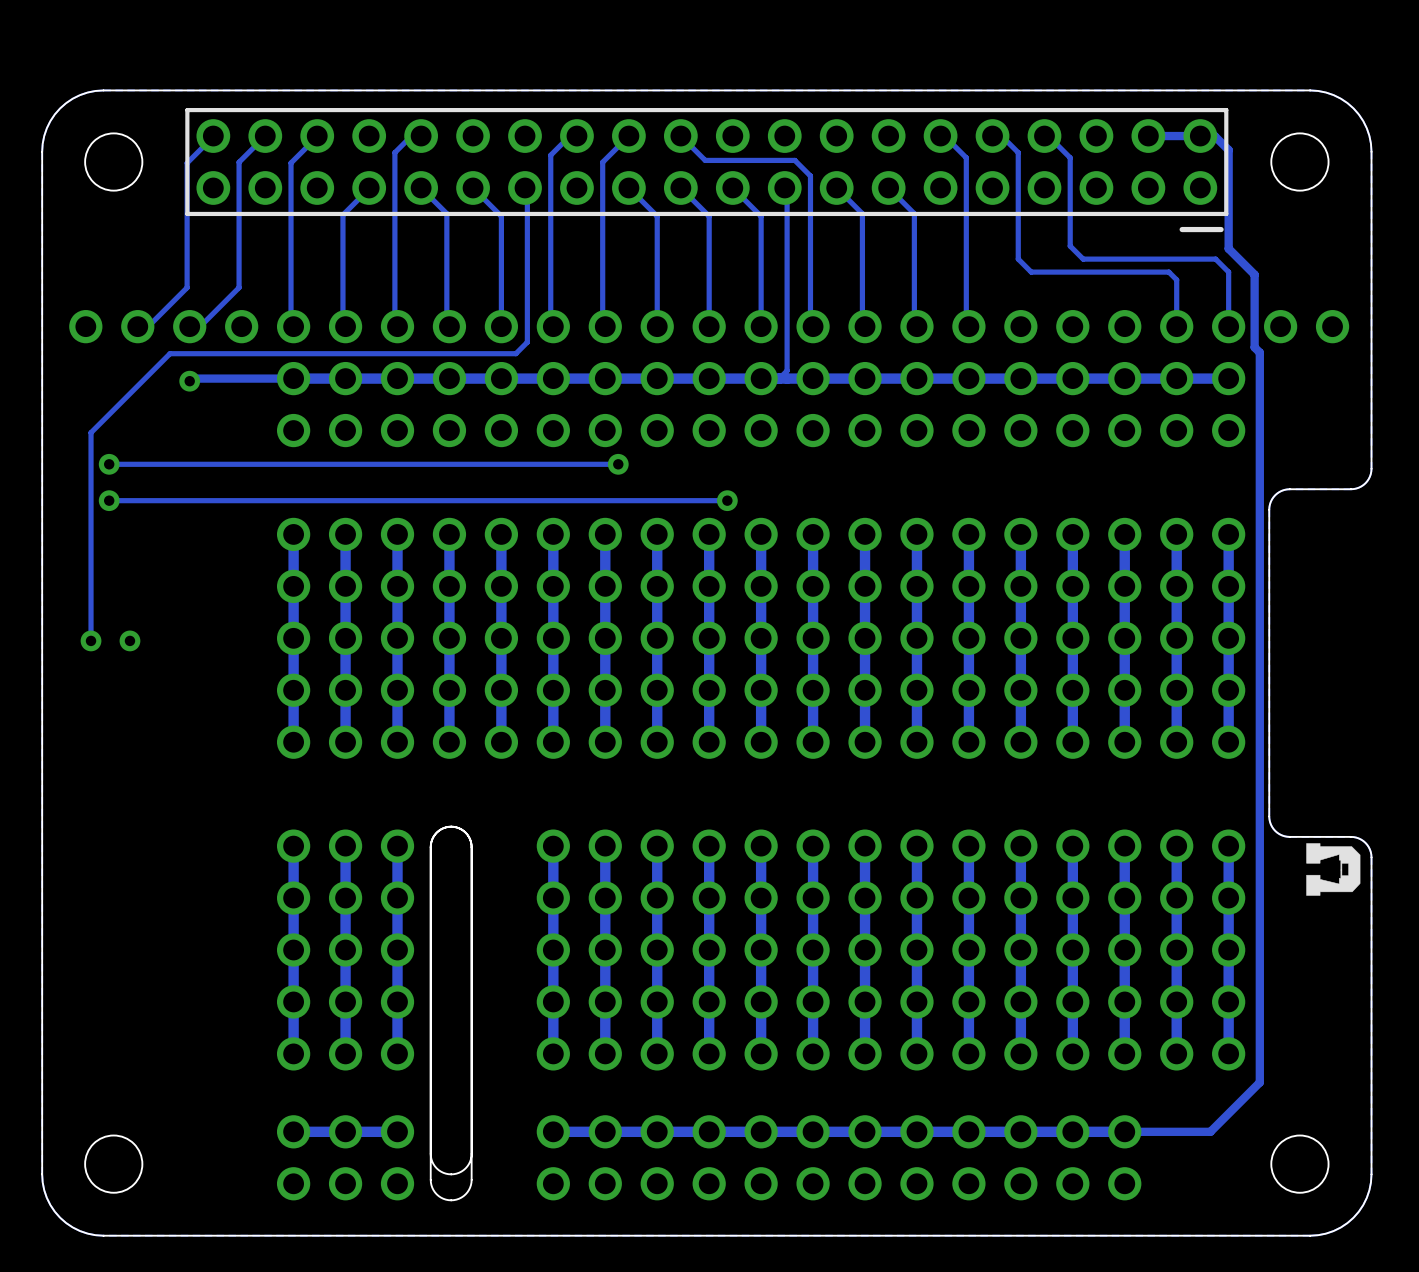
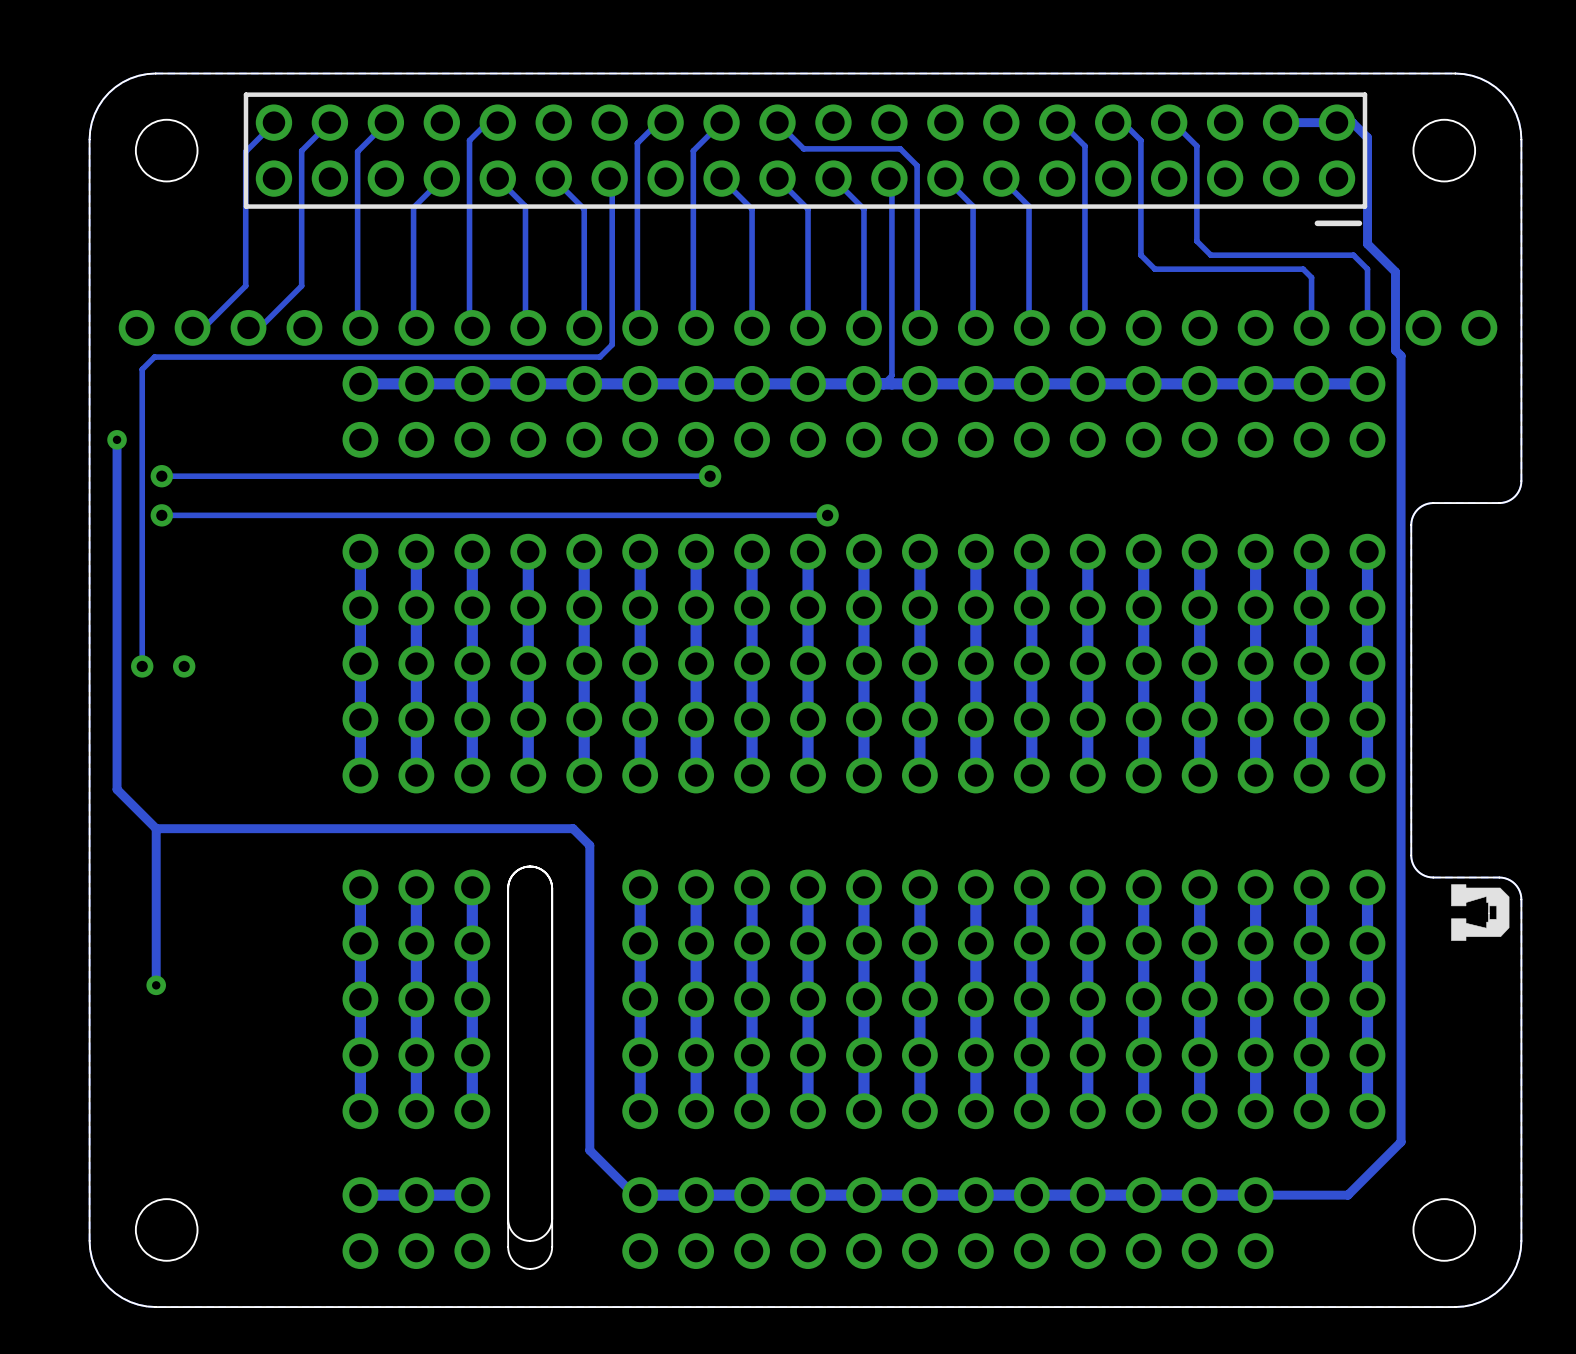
track: (170, 353) (91, 432) -> (227, 357) (154, 357) (142, 369) (142, 442)
track: (293, 378) (192, 378) (189, 381) -> none
via: (189, 381) -> none
track: none -> (117, 439) (117, 789) (156, 828)
via: none -> (117, 439)
track: none -> (156, 828) (156, 985)
track: none -> (156, 828) (573, 828) (589, 845) (589, 1150) (637, 1197)
via: none -> (156, 985)

